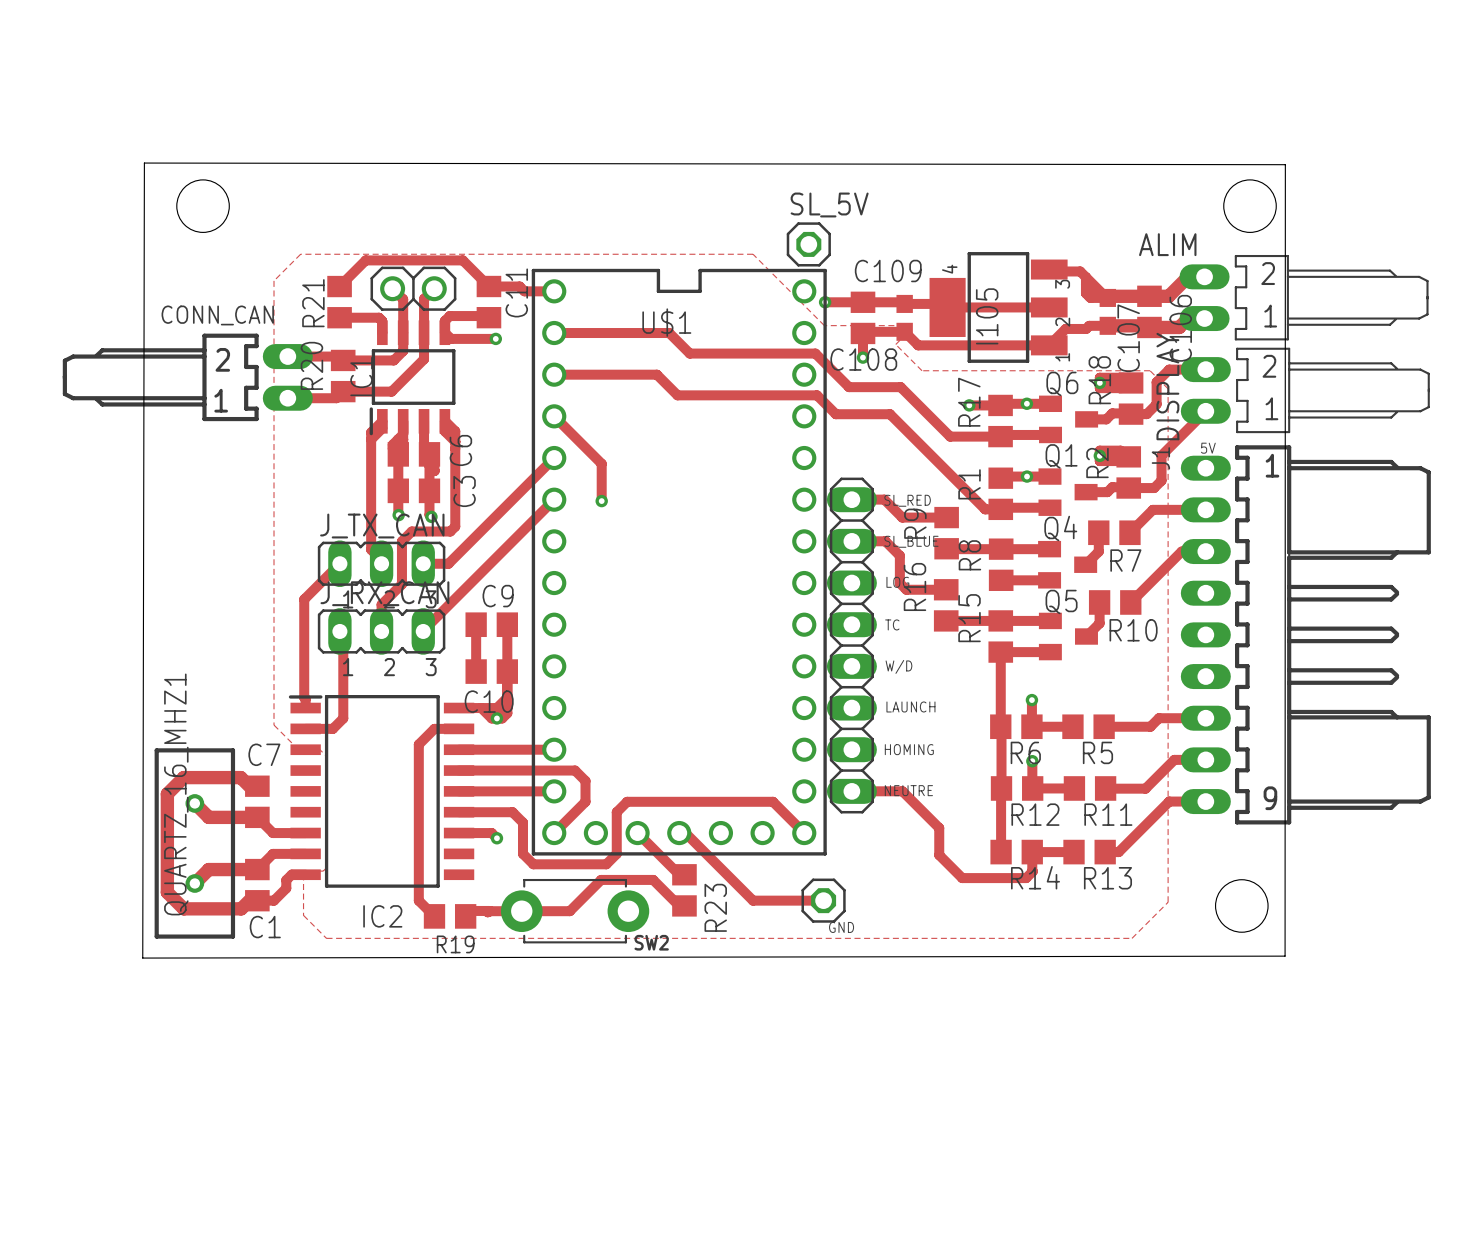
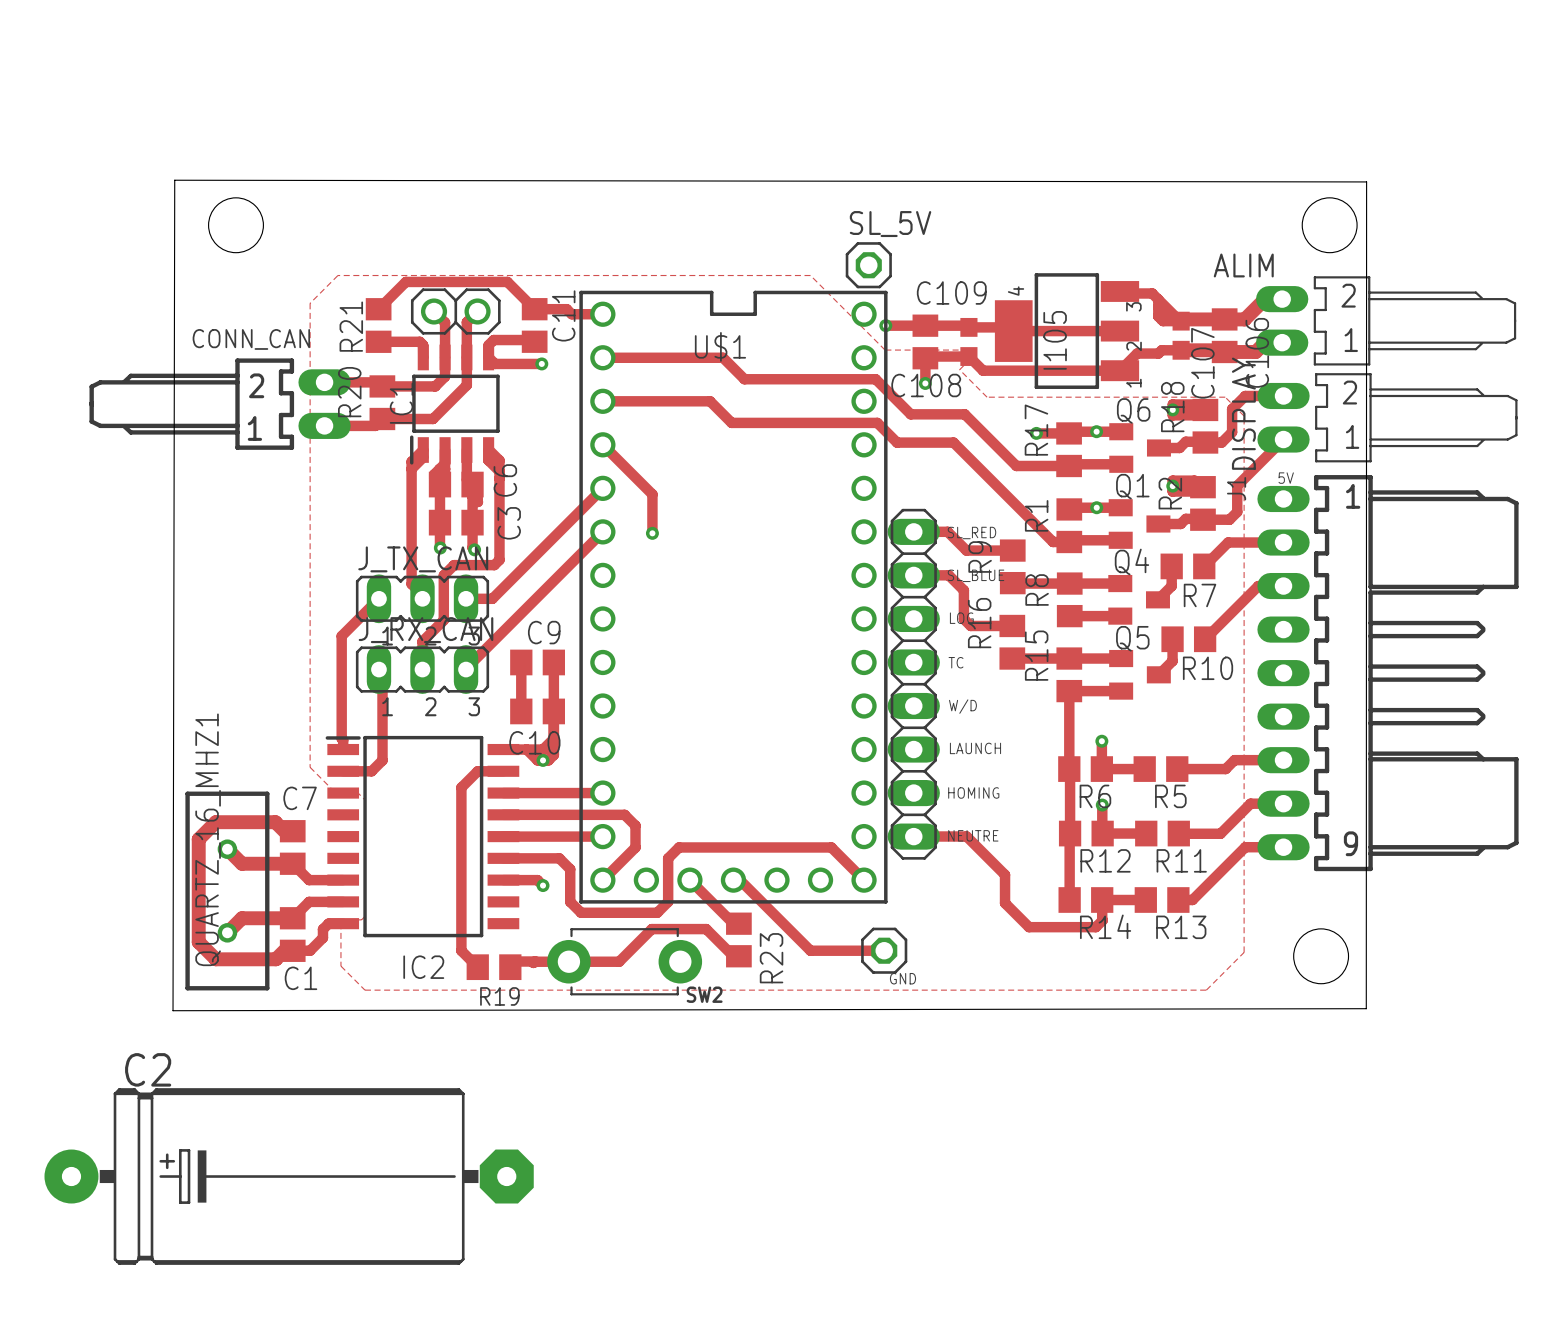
C2: none -> (289, 1176)

